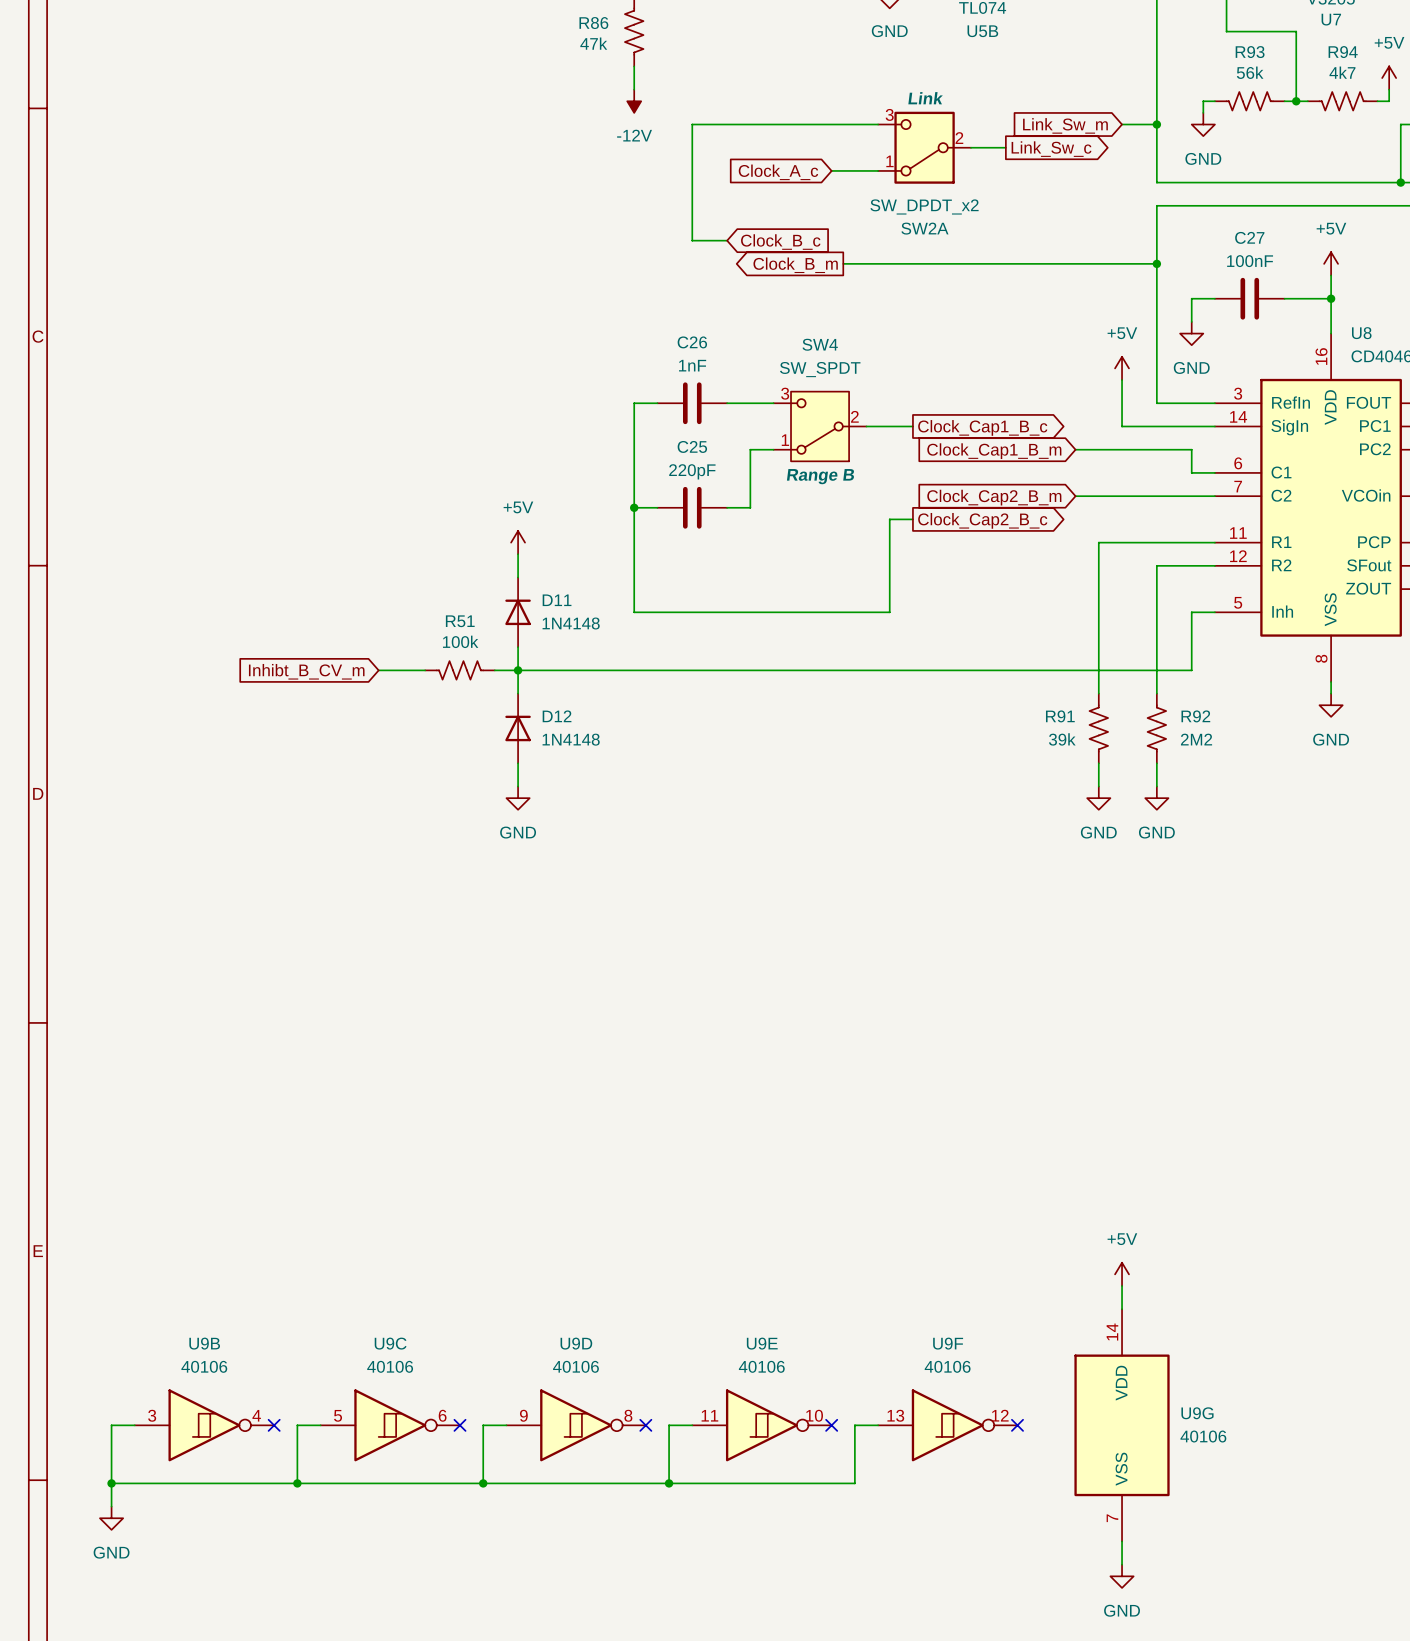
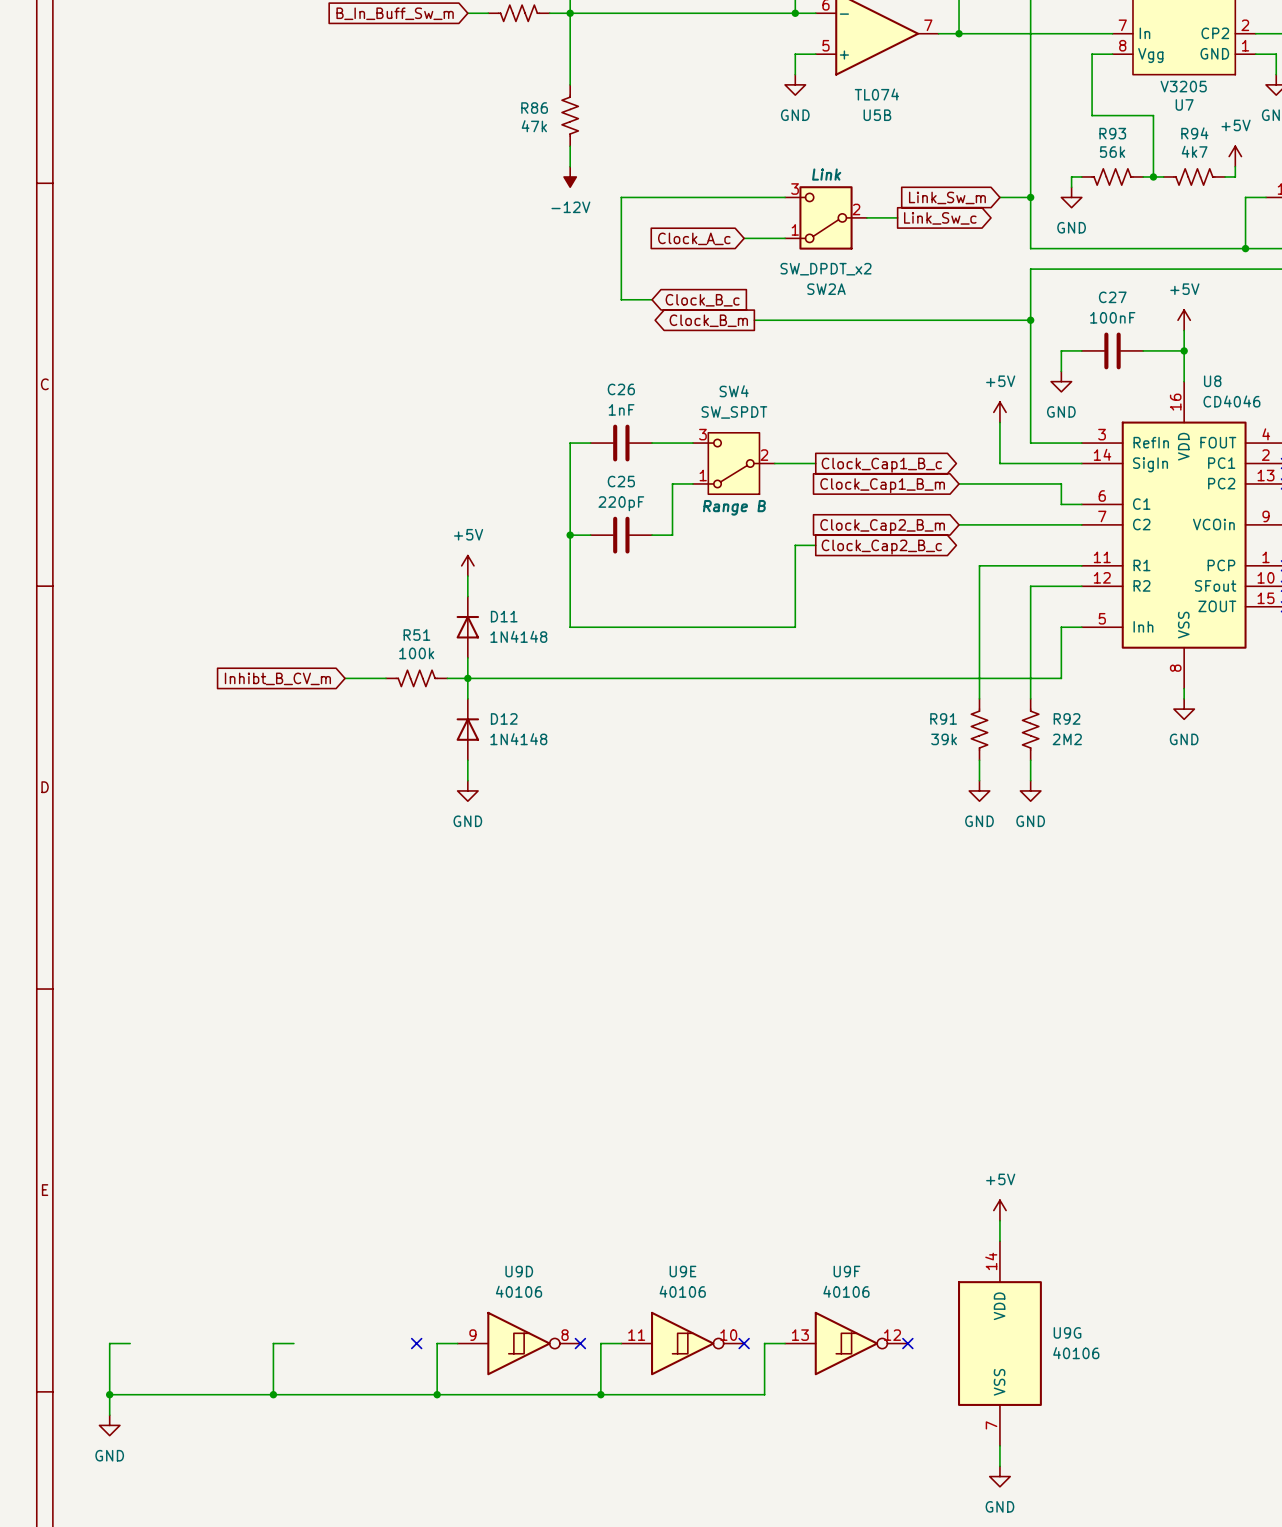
U9B: 40106 (204, 1425) -> none
no-connect mark: (274, 1425) -> none
U9C: 40106 (390, 1425) -> none

